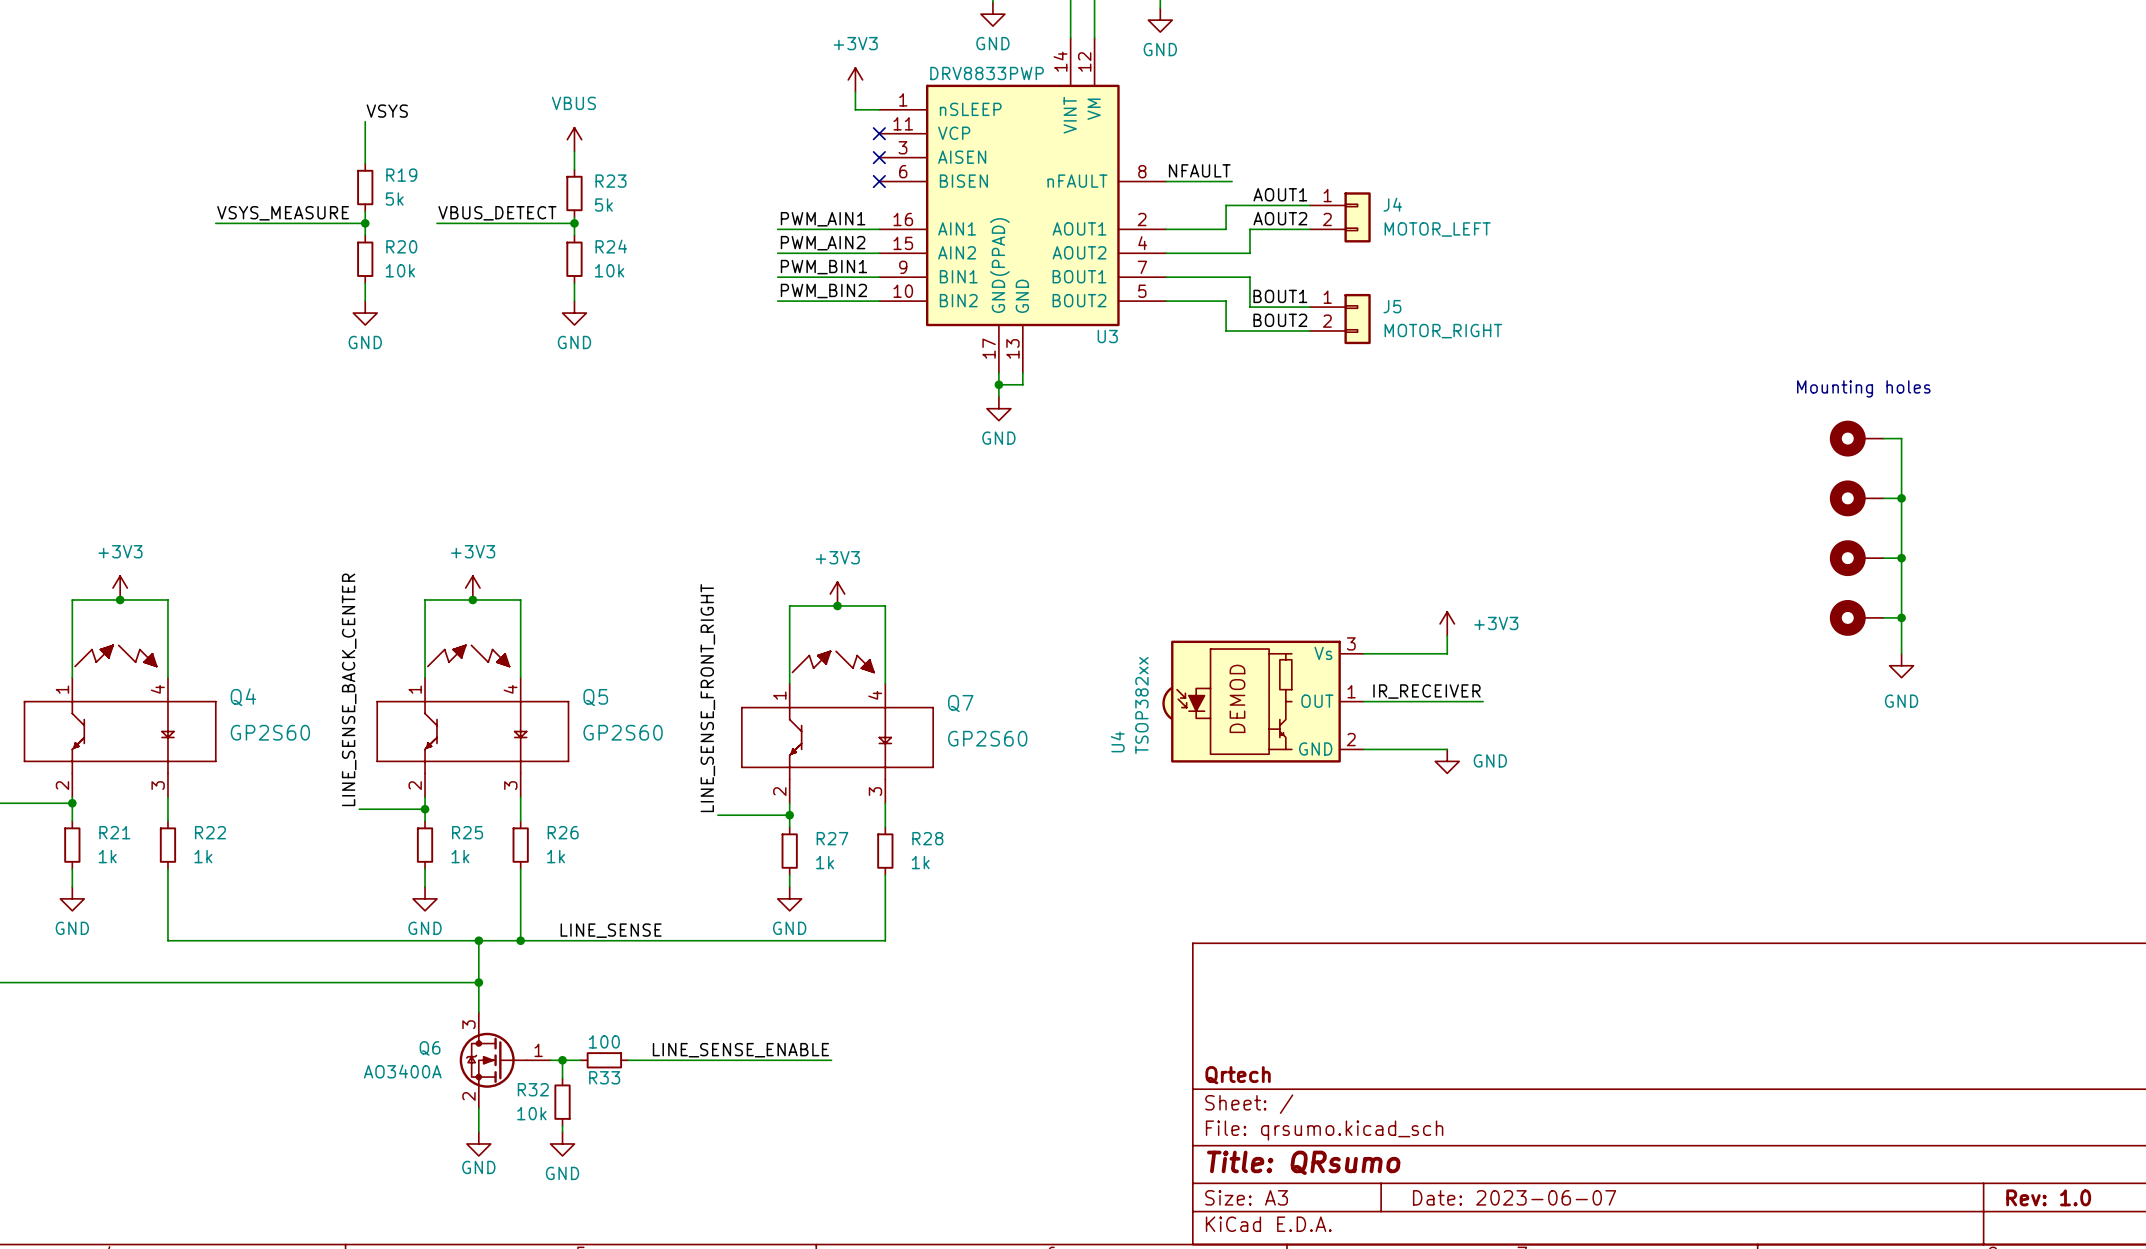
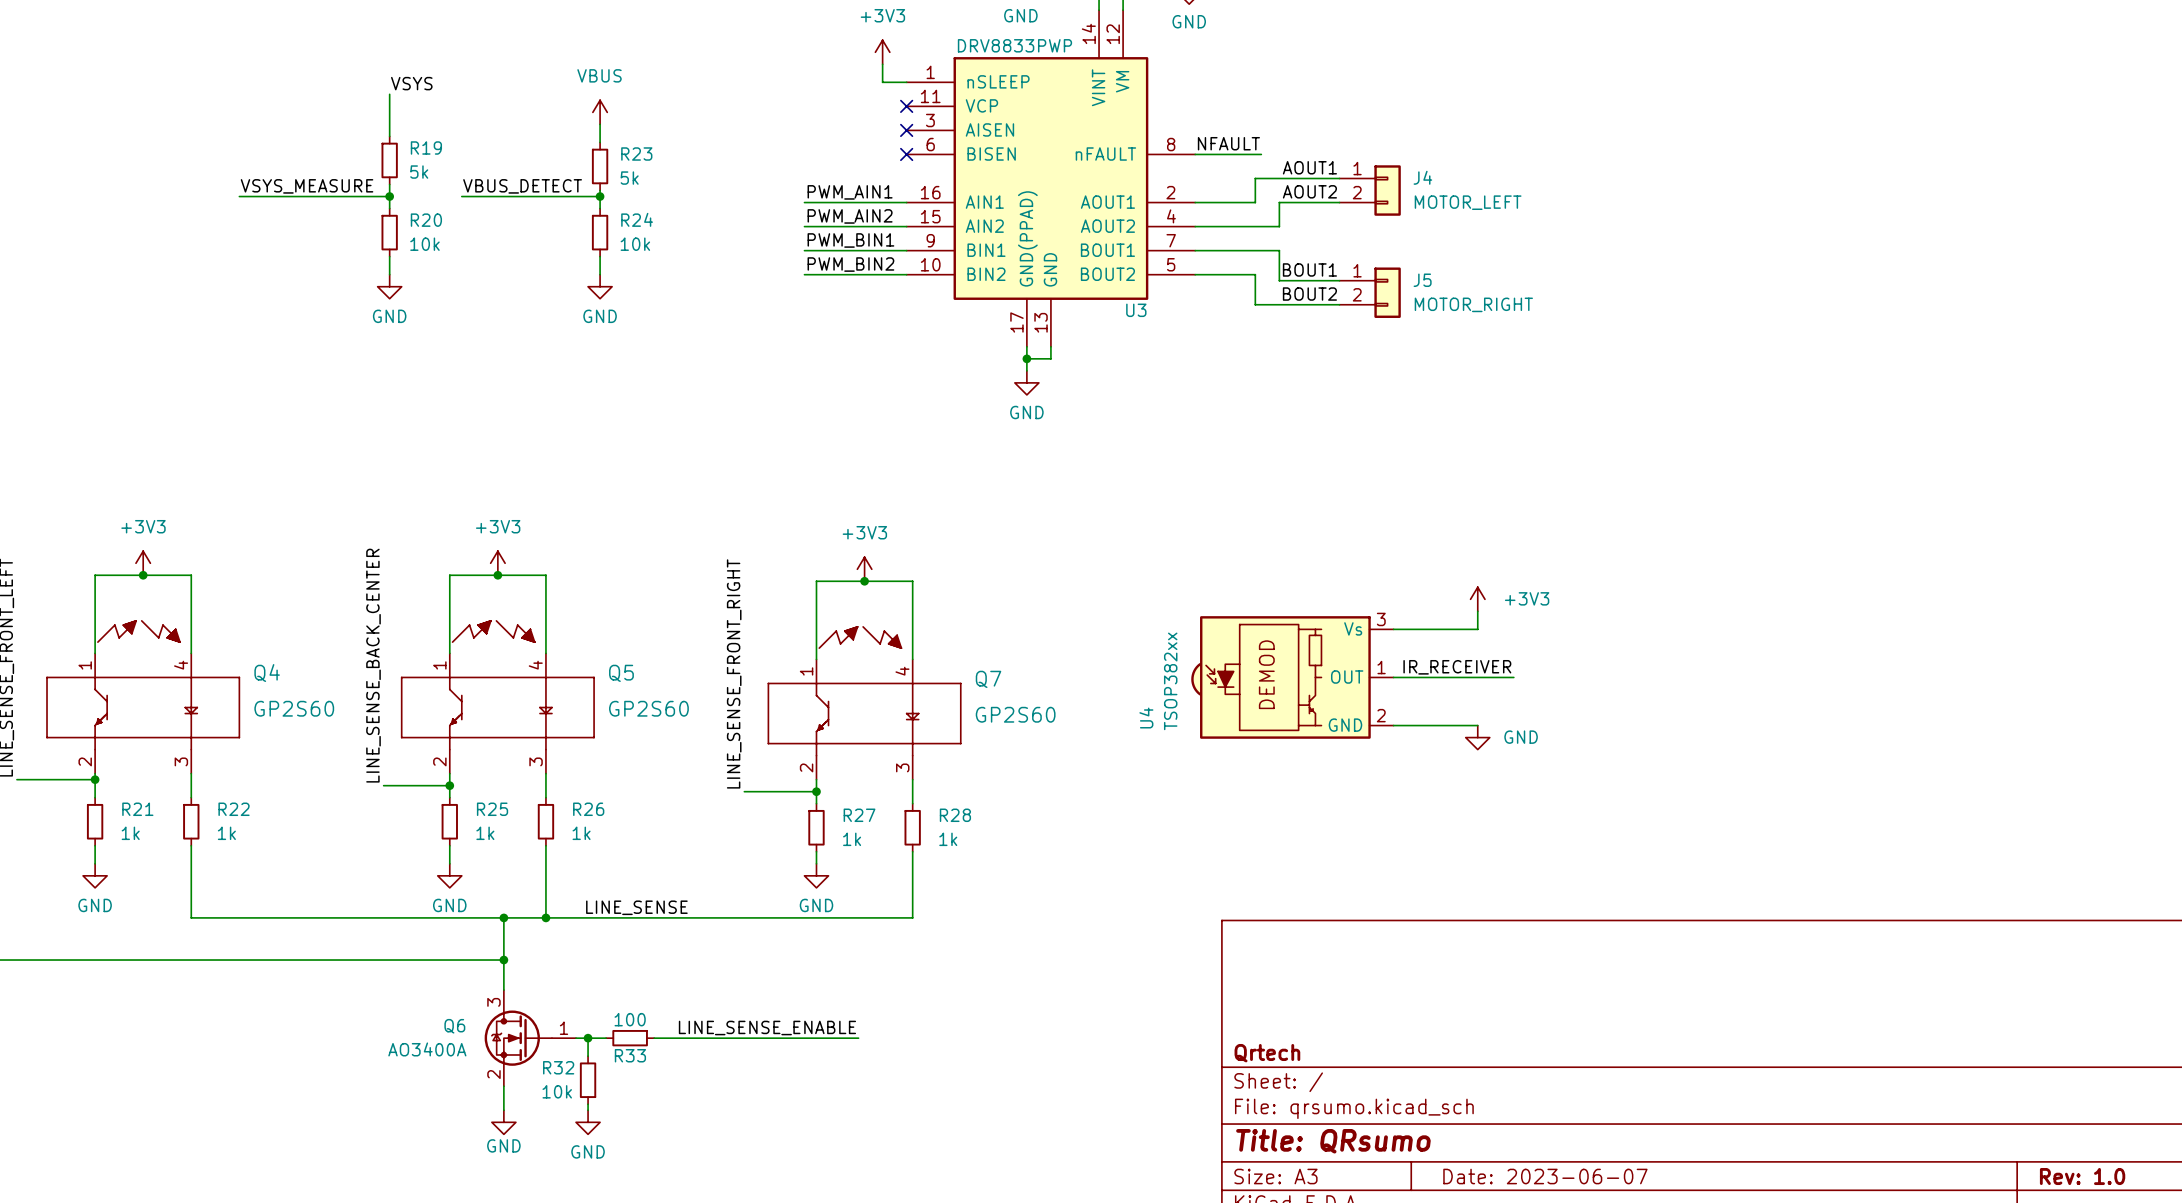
text: Mounting holes (1863, 388) -> none
part: (1856, 438) -> none
wire: (1883, 438) (1901, 438) (1901, 653) -> none
part: (1856, 498) -> none
wire: (1883, 498) (1901, 498) -> none
junction: (1901, 498) -> none
part: (1856, 558) -> none
wire: (1883, 558) (1901, 558) -> none
junction: (1901, 558) -> none
part: (1856, 617) -> none
wire: (1883, 617) (1901, 617) -> none
junction: (1901, 617) -> none
power symbol: GND (1901, 665) -> none

